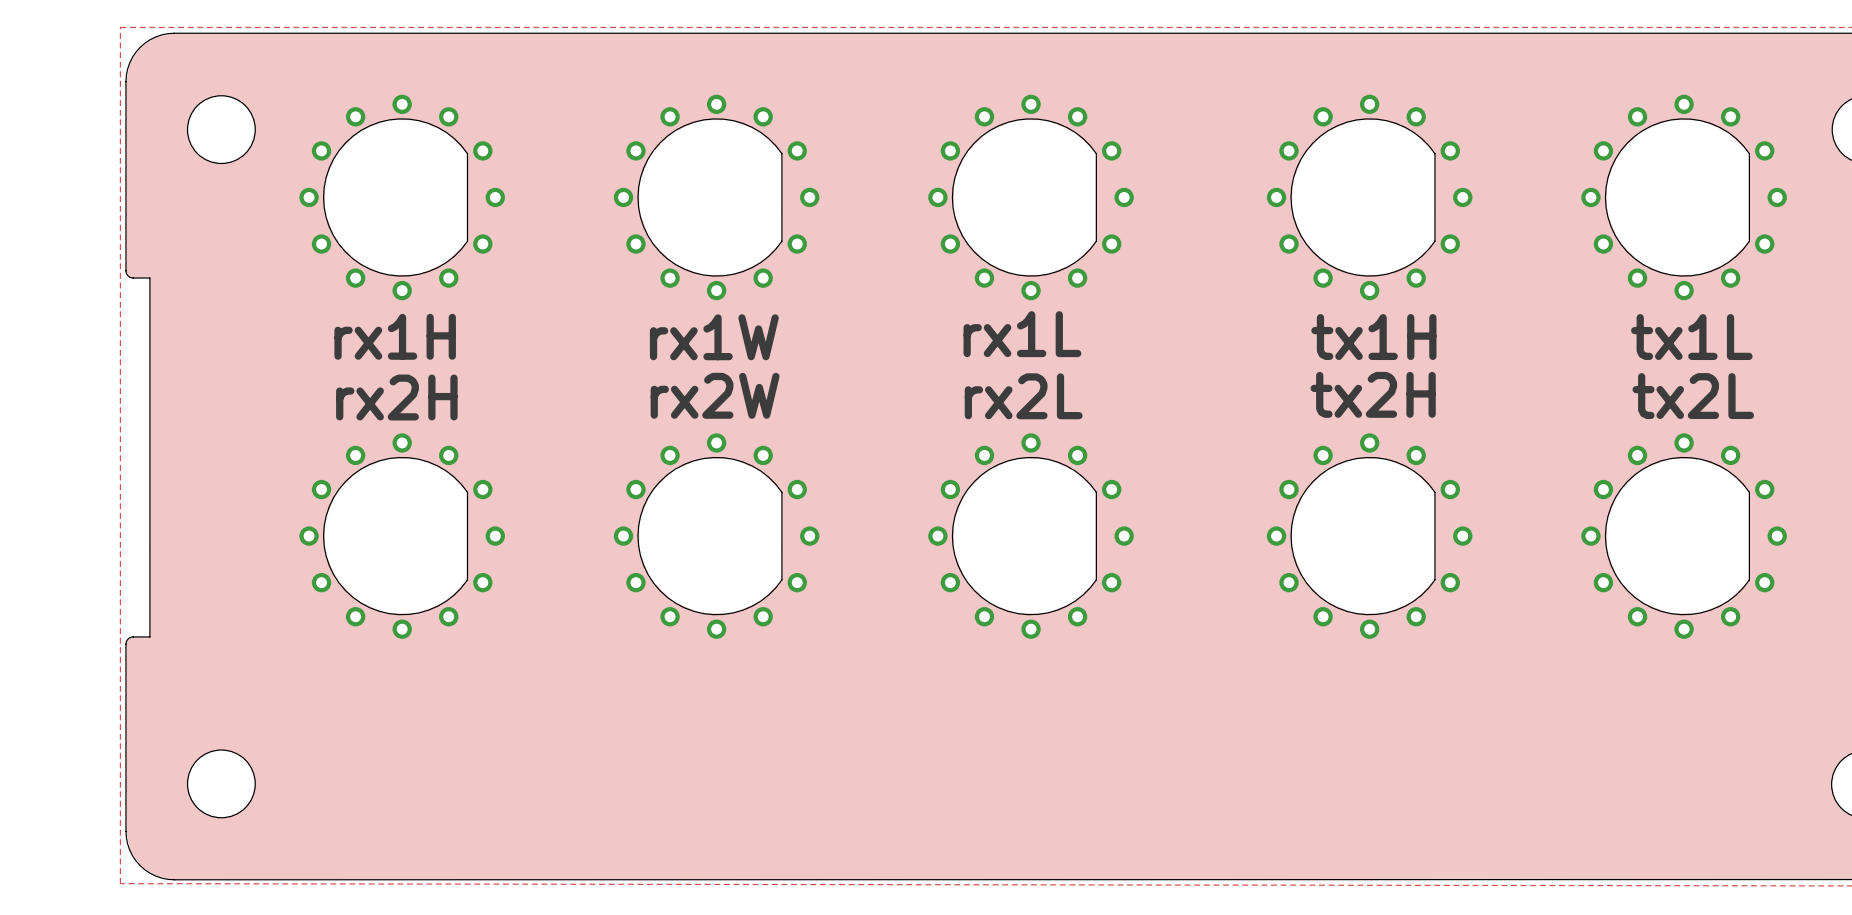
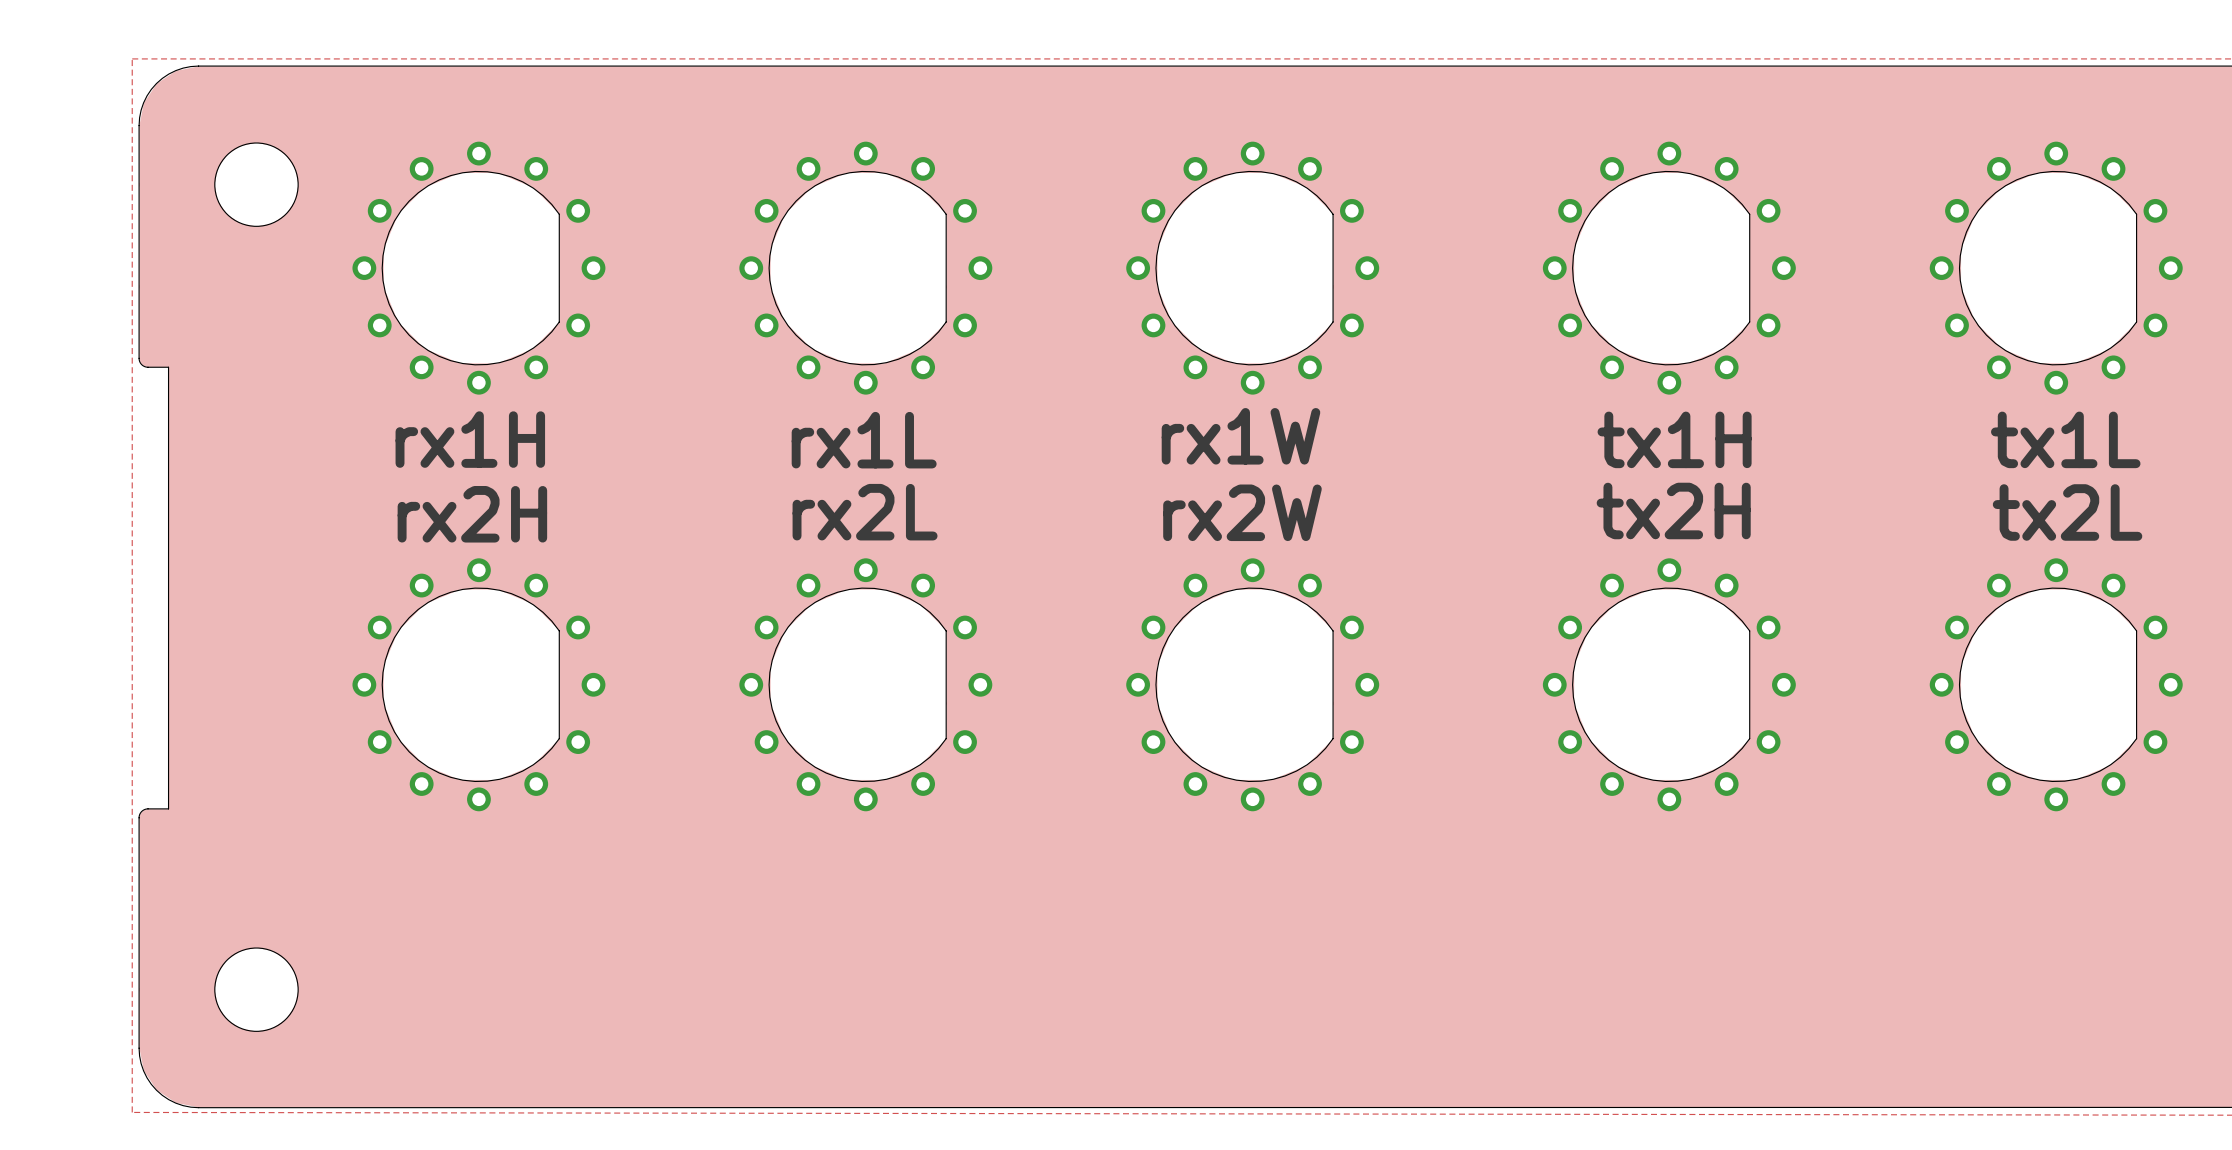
text: rx1L (1022, 334) -> rx1W (1240, 436)
text: rx1W (714, 337) -> rx1L (864, 440)
text: rx2W (715, 395) -> rx2L (865, 512)
text: rx2L (1023, 396) -> rx2W (1242, 512)

